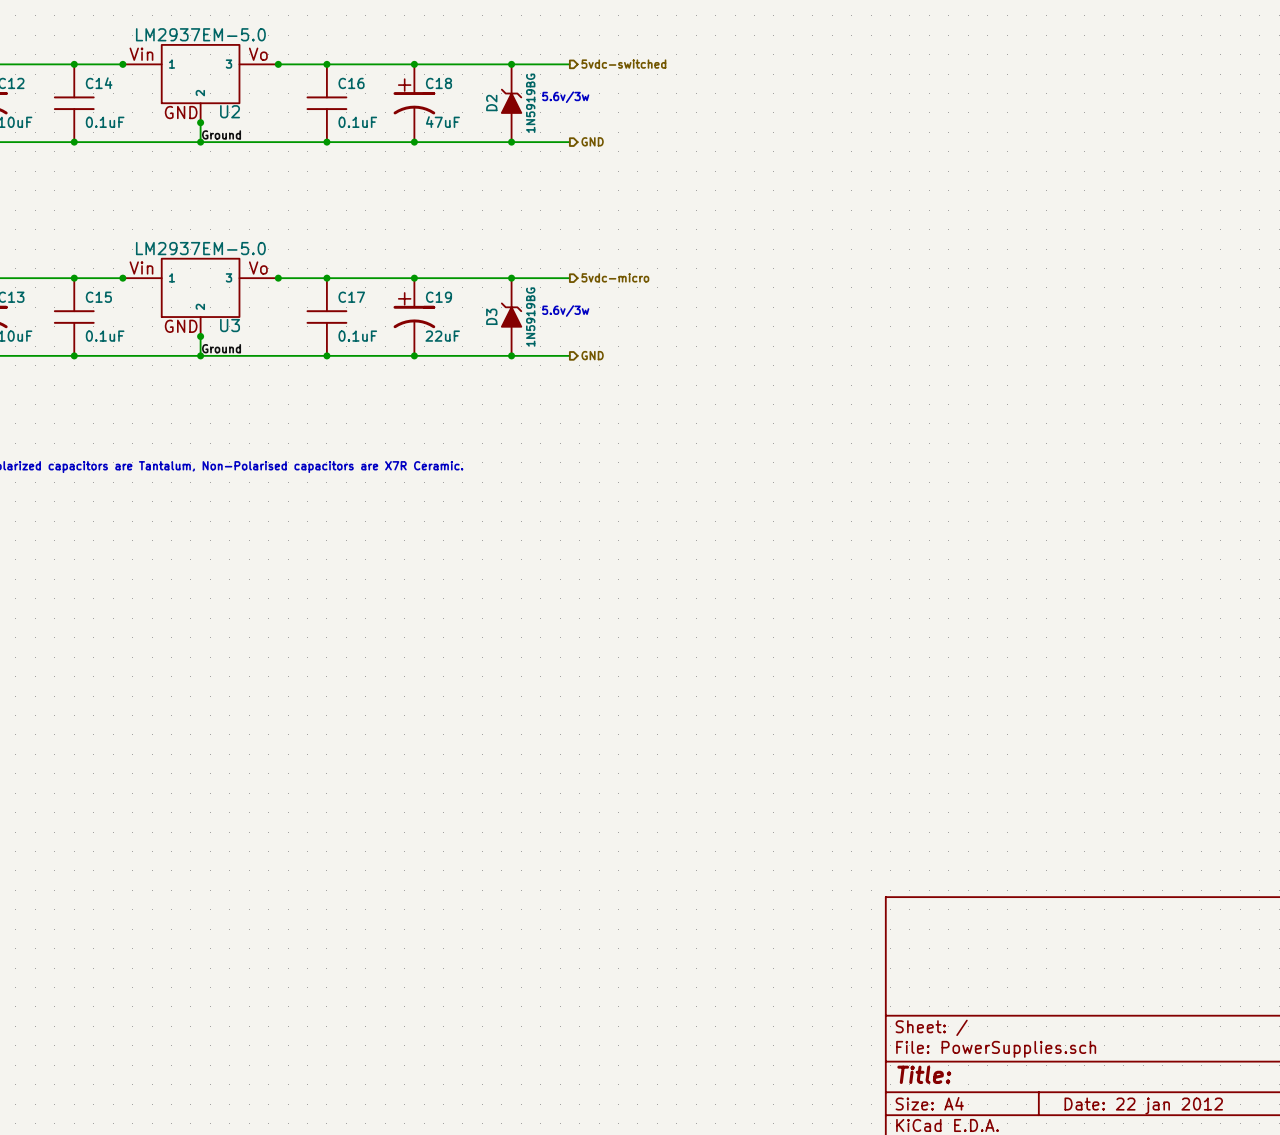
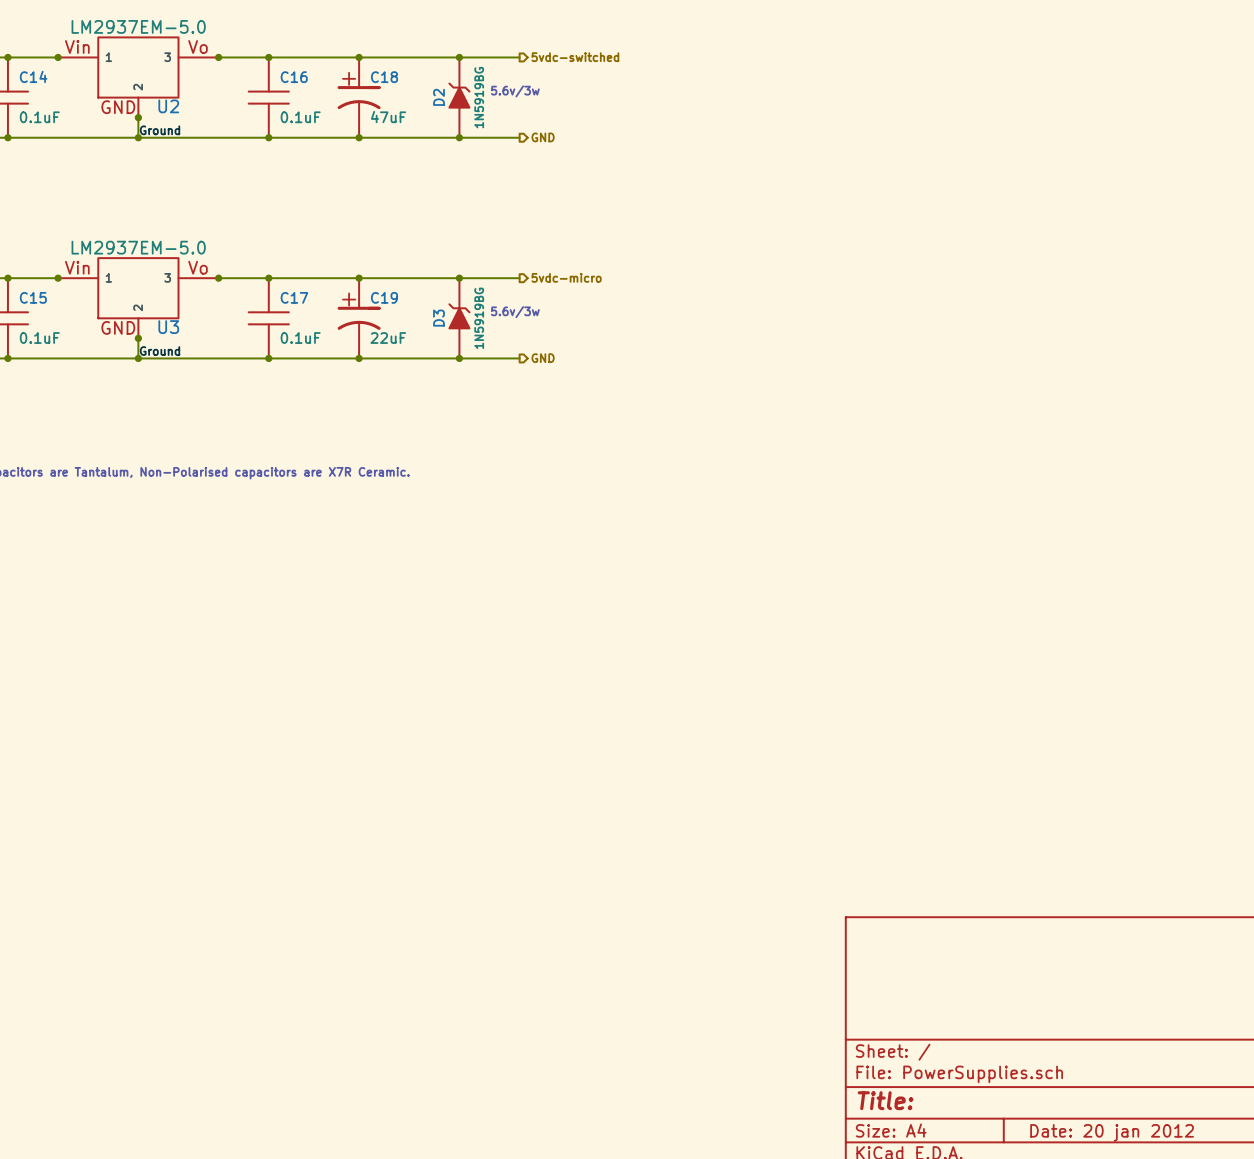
title block: Date: 22 jan 2012 (1143, 1105) -> Date: 20 jan 2012 (1112, 1132)

